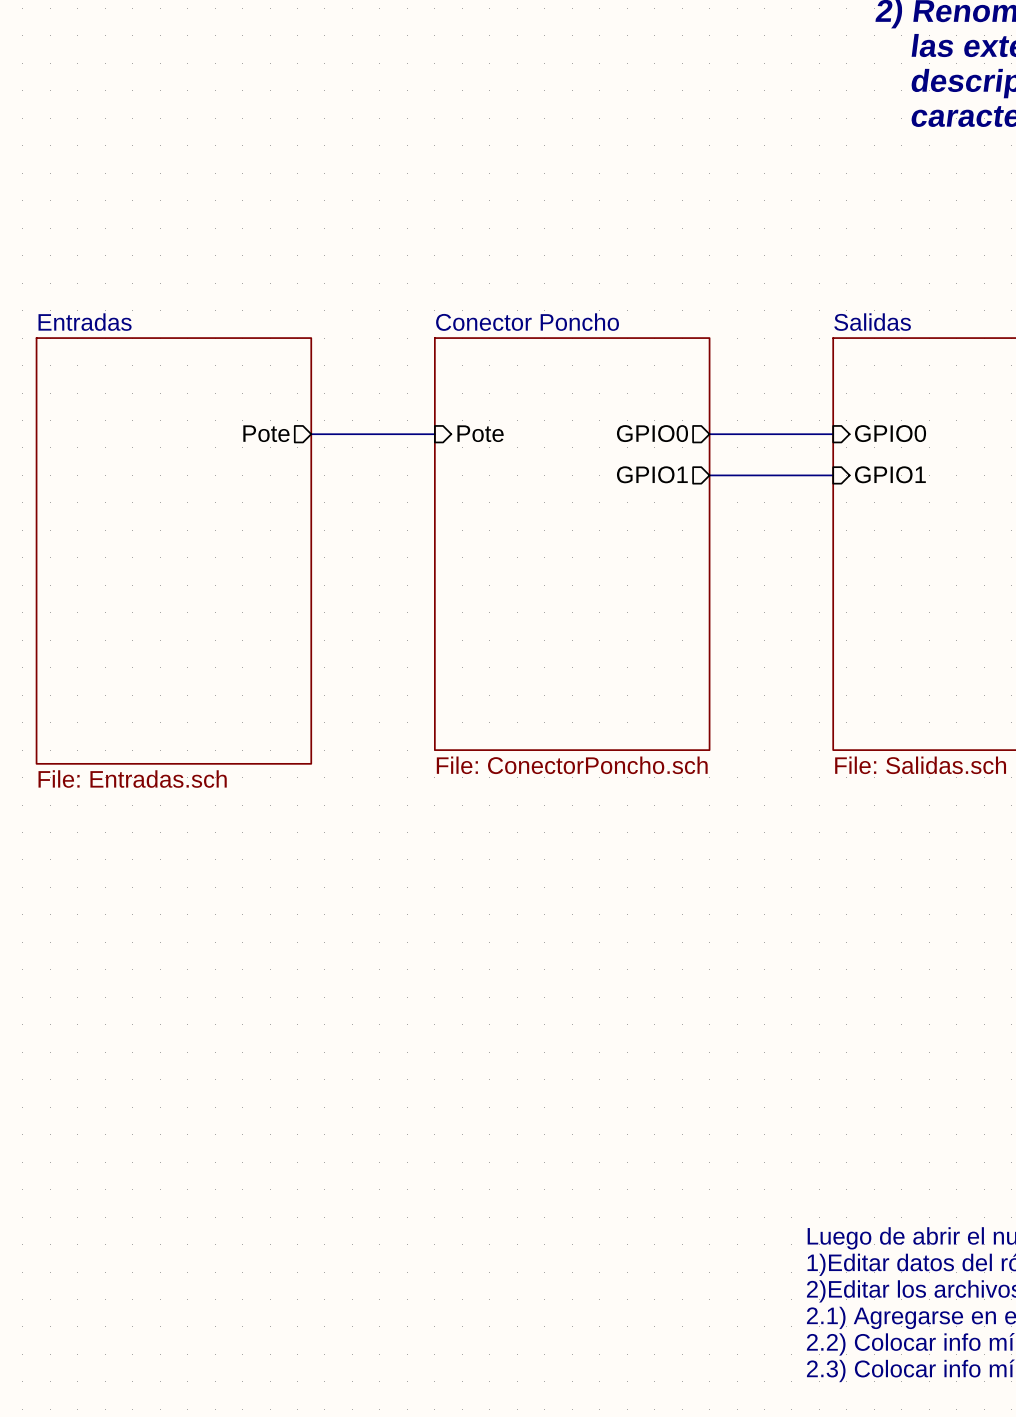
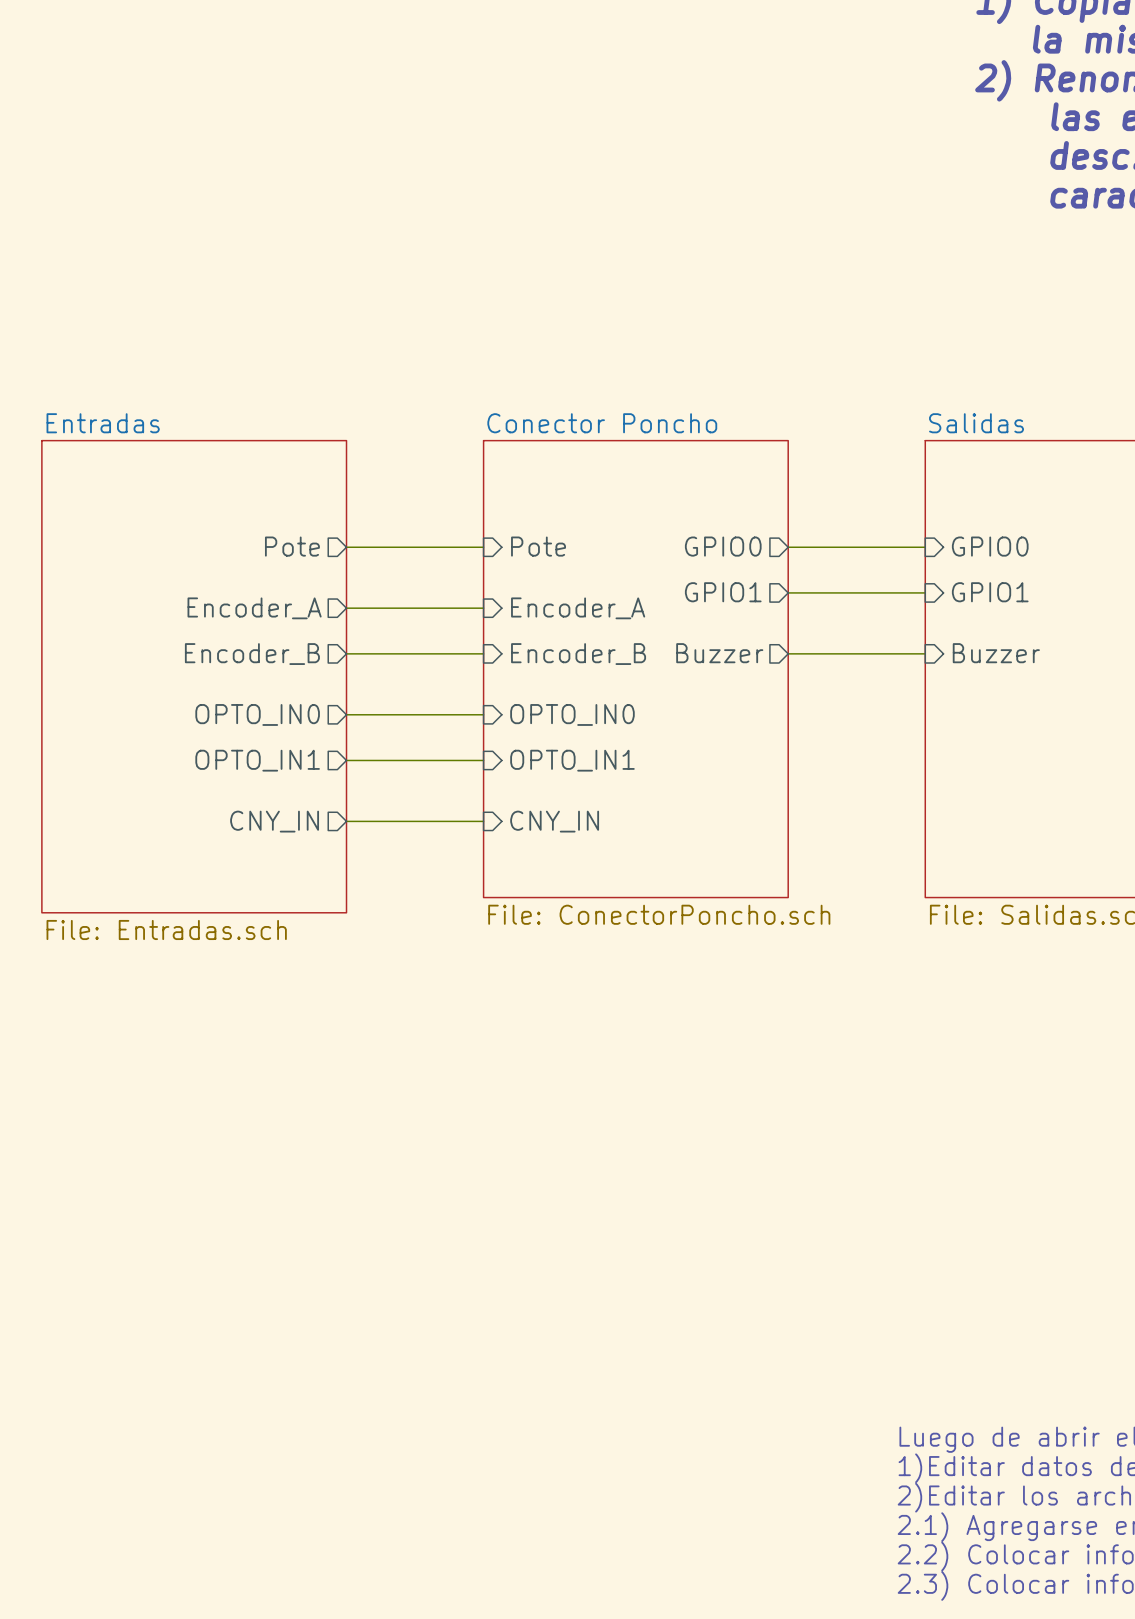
wire: none -> (346, 608) (483, 608)
sheet pin: none -> Encoder_A (254, 608)
sheet pin: none -> Encoder_A (578, 608)
sheet pin: none -> Buzzer (719, 653)
sheet pin: none -> Buzzer (996, 653)
wire: none -> (346, 653) (483, 653)
wire: none -> (788, 653) (925, 653)
sheet pin: none -> Encoder_B (252, 654)
sheet pin: none -> Encoder_B (578, 654)
wire: none -> (346, 714) (483, 714)
sheet pin: none -> OPTO_IN0 (257, 714)
sheet pin: none -> OPTO_IN0 (572, 714)
wire: none -> (346, 760) (483, 760)
sheet pin: none -> OPTO_IN1 (257, 760)
sheet pin: none -> OPTO_IN1 (572, 760)
wire: none -> (346, 821) (483, 821)
sheet pin: none -> CNY_IN (274, 821)
sheet pin: none -> CNY_IN (554, 821)

